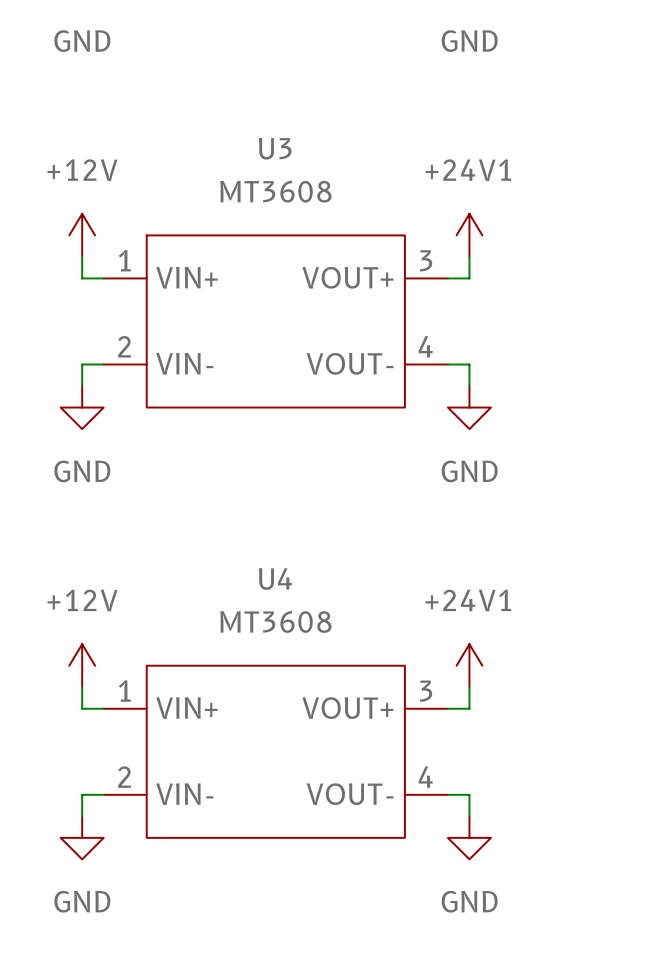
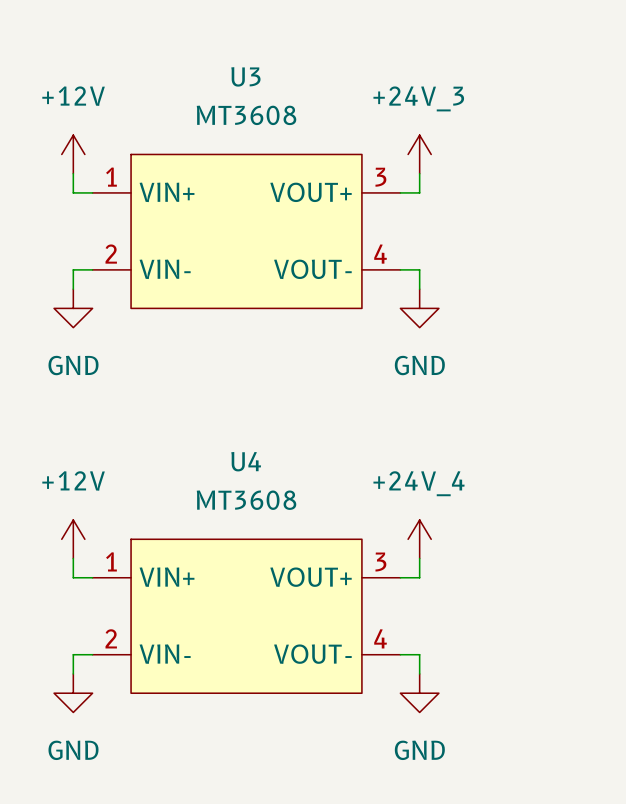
power symbol: +24V1 (469, 235) -> +24V_3 (419, 154)
power symbol: +24V1 (469, 665) -> +24V_4 (419, 539)

